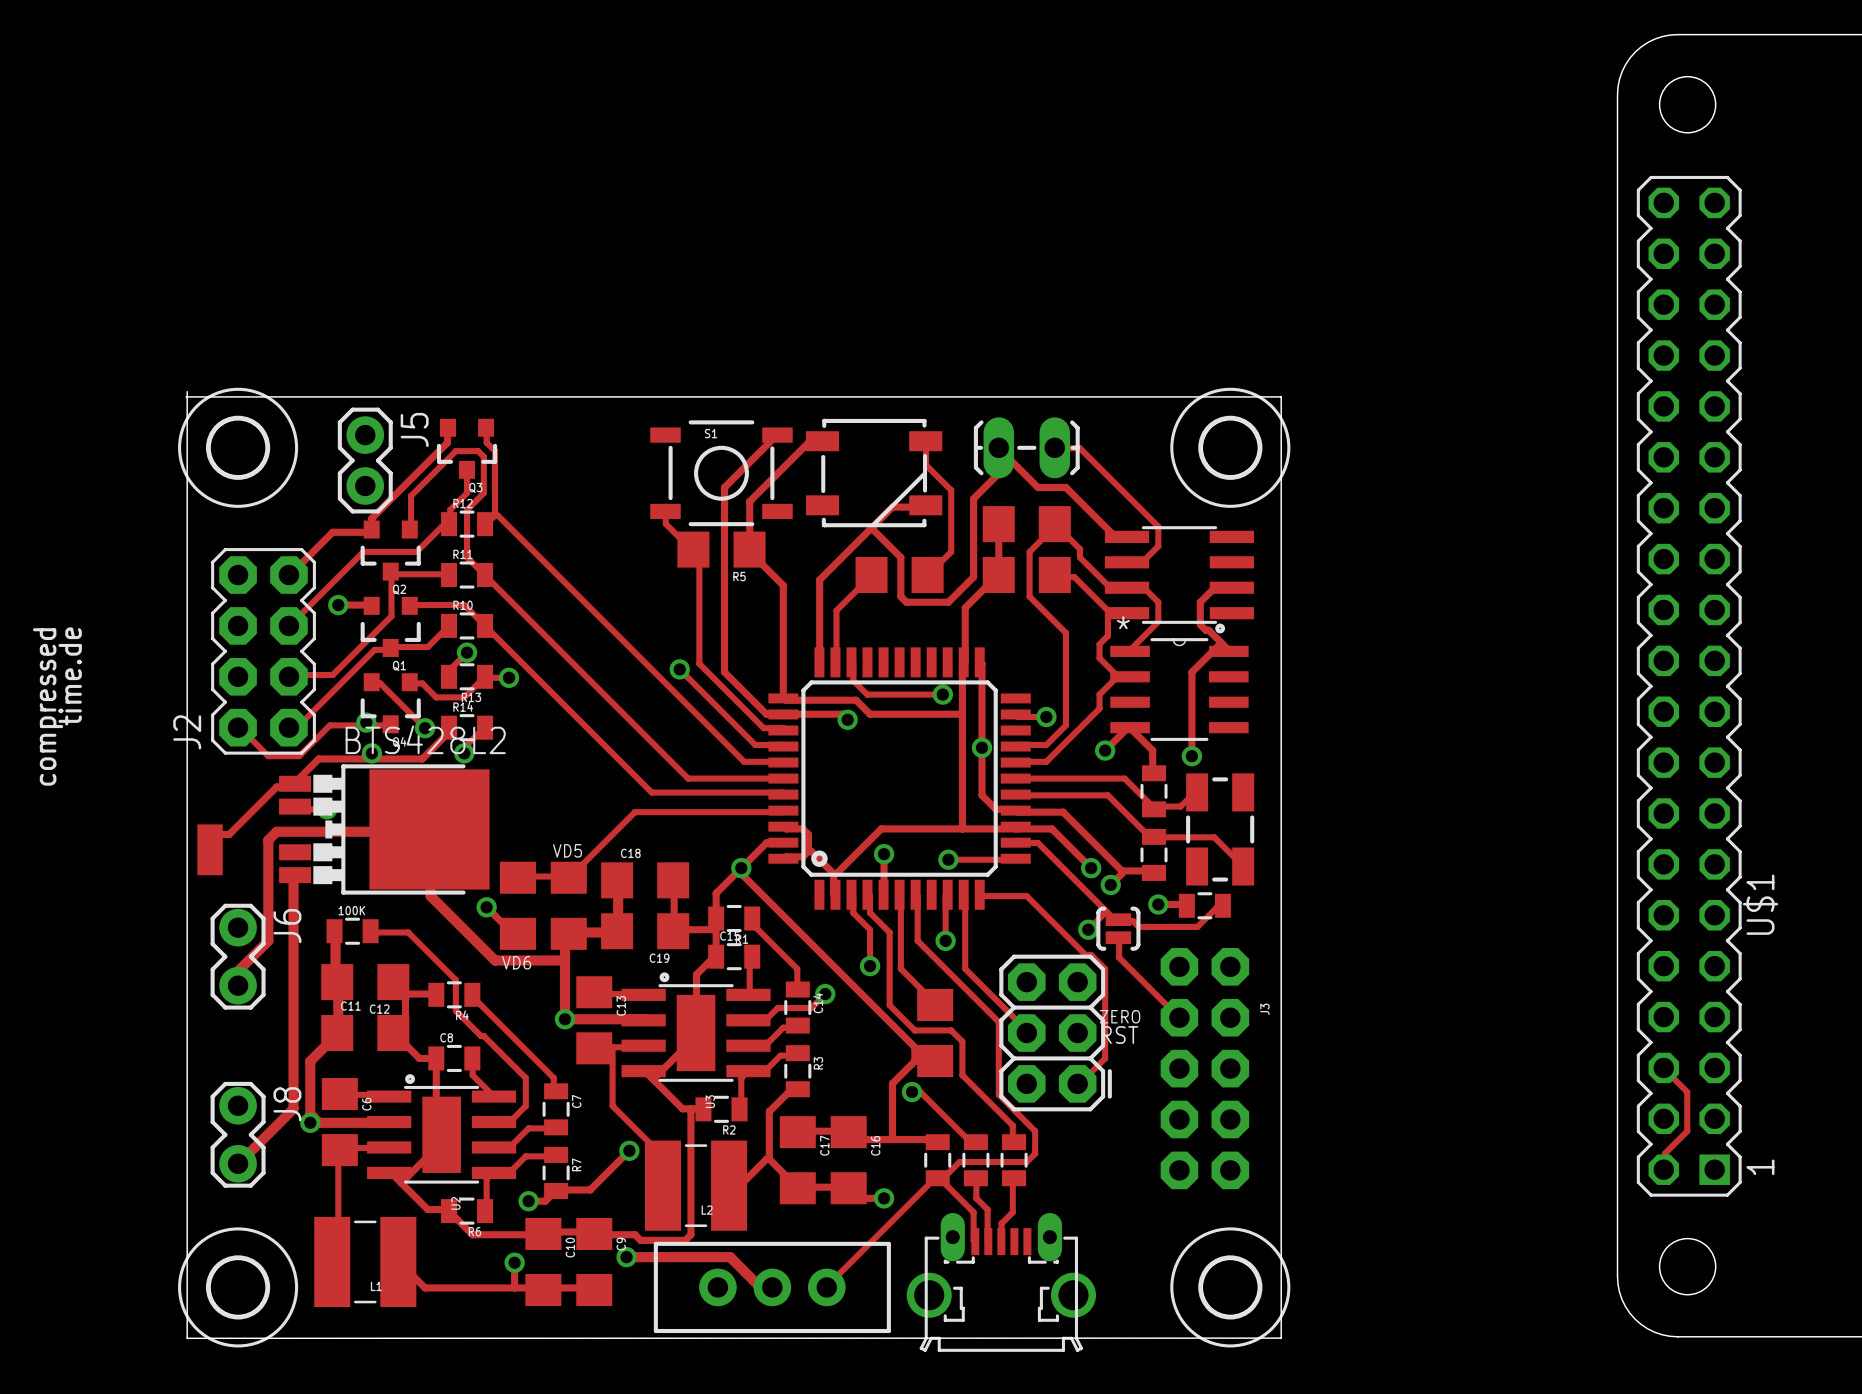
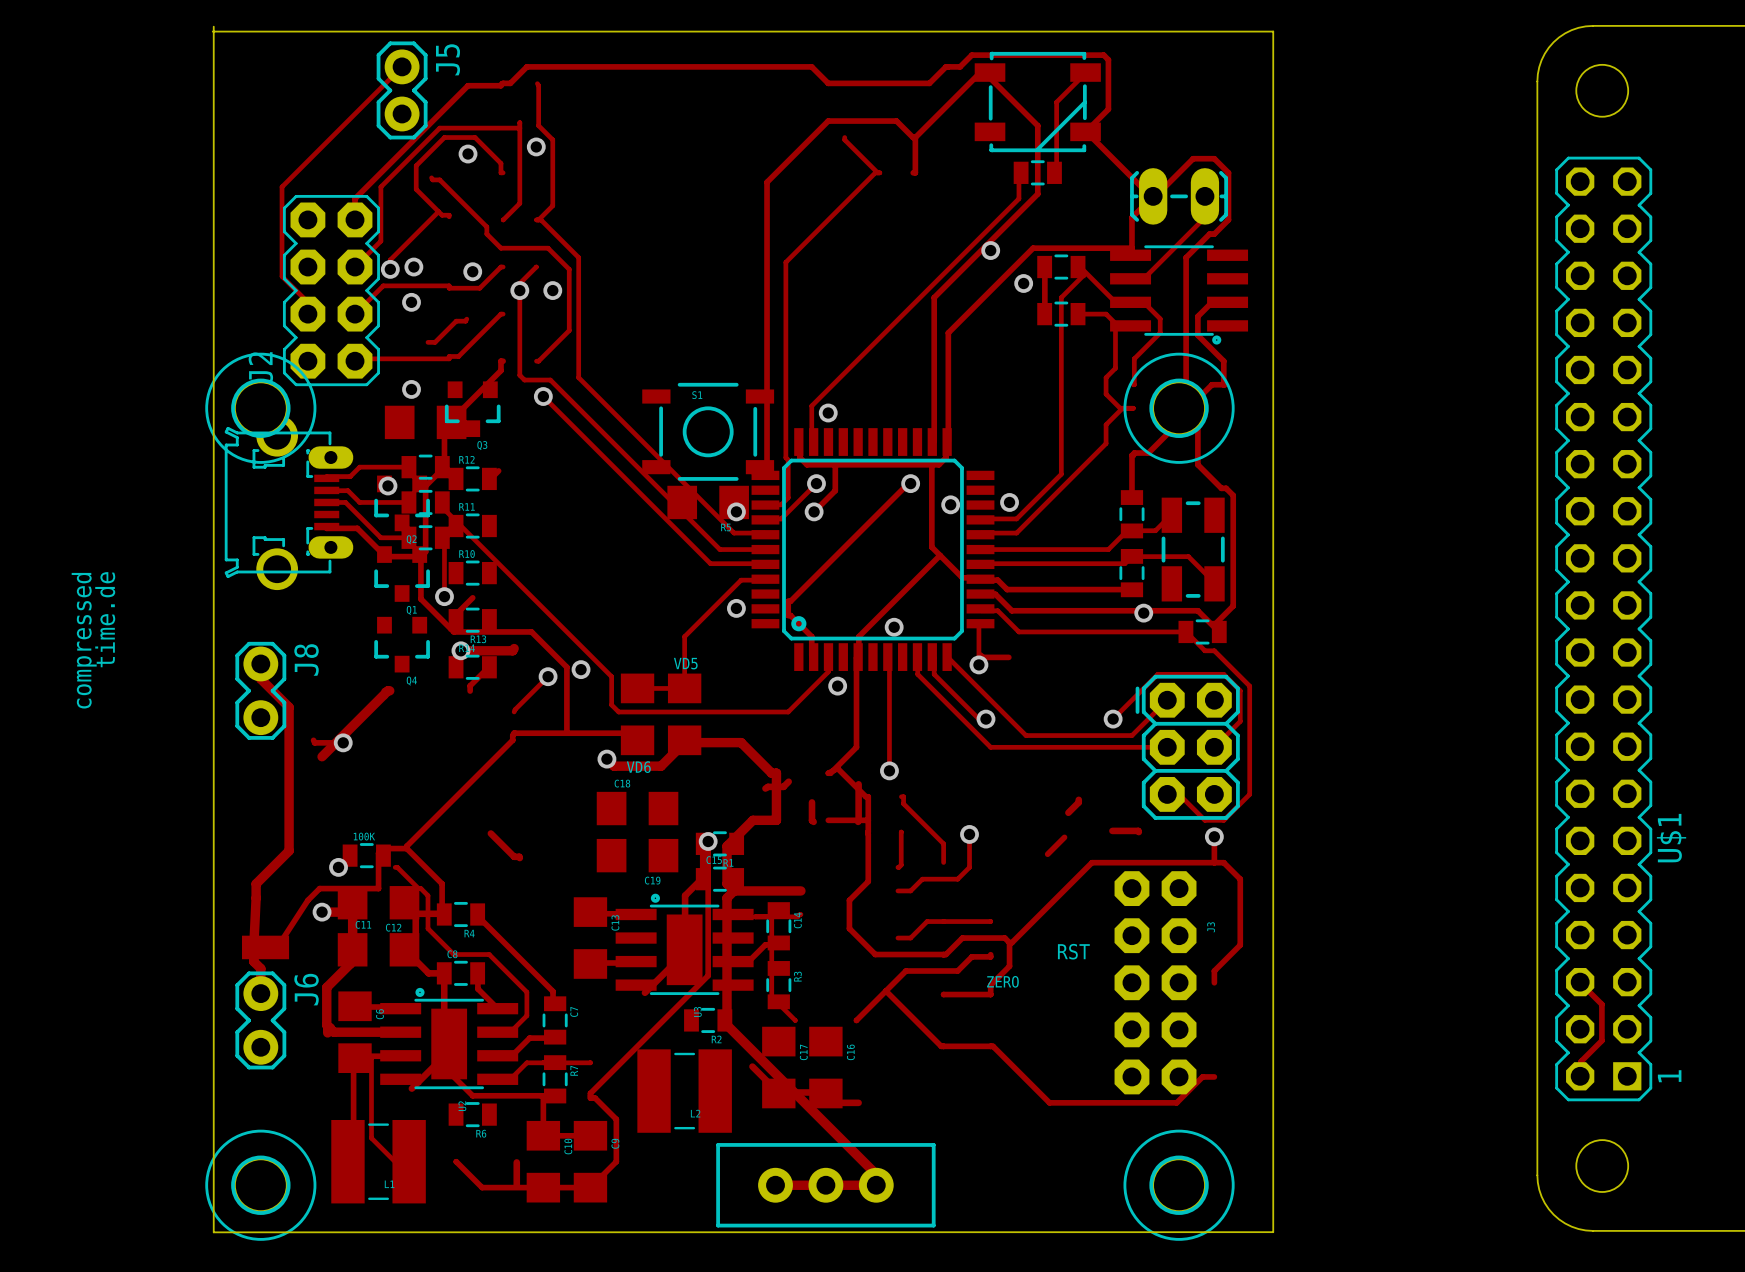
board edge: none -> (213, 26) (213, 356)
track: none -> (402, 66) (282, 186) (282, 276) (307, 302) (307, 314)
track: none -> (1085, 72) (1056, 102) (1056, 172) (1054, 172)
track: none -> (537, 83) (538, 125) (552, 139) (552, 205) (538, 219)
track: none -> (519, 122) (519, 203) (503, 219)
track: none -> (519, 128) (439, 128) (380, 186) (380, 241) (355, 267)
track: none -> (844, 137) (844, 139) (877, 172)
track: none -> (915, 137) (915, 172) (913, 172)
track: none -> (915, 137) (978, 73) (990, 72) (988, 76) (1037, 125) (1037, 194) (934, 297) (934, 441) (932, 442)
track: none -> (915, 137) (913, 137) (896, 121) (828, 121) (767, 182) (767, 474) (765, 475)
via: none -> (536, 146)
via: none -> (468, 154)
track: none -> (503, 172) (500, 172) (500, 163) (475, 137) (444, 137) (416, 165) (416, 189) (442, 215) (449, 215) (449, 216)
track: none -> (879, 172) (875, 172) (785, 262) (785, 457) (788, 460) (788, 497) (781, 504) (765, 505)
track: none -> (1021, 172) (1018, 172) (1018, 198) (811, 405) (811, 441) (813, 442)
part: none -> (1037, 172)
track: none -> (431, 177) (432, 179) (439, 179) (486, 227) (486, 234) (500, 248) (548, 248) (569, 269) (569, 330) (536, 361)
track: none -> (1153, 196) (1131, 217) (1130, 255)
track: none -> (1204, 196) (1204, 217) (1143, 278) (1130, 278)
track: none -> (438, 211) (390, 259) (390, 269)
track: none -> (355, 219) (355, 198) (468, 85) (500, 85) (503, 83) (510, 83) (526, 66) (811, 66) (828, 83) (929, 83) (945, 66) (960, 66) (971, 55) (1103, 55) (1108, 59) (1108, 109) (1085, 131) (1150, 196) (1155, 196) (1193, 158) (1214, 158) (1228, 172) (1228, 219) (1214, 234) (1209, 234) (1186, 257) (1186, 415) (1148, 453) (1134, 453) (1131, 455) (1131, 497)
track: none -> (536, 219) (541, 219) (578, 257) (578, 377) (734, 533) (764, 533) (765, 534)
track: none -> (1131, 248) (1033, 248) (948, 332) (948, 441) (945, 443) (945, 457) (938, 464) (807, 464) (799, 457) (798, 442)
via: none -> (990, 250)
via: none -> (413, 267)
track: none -> (503, 267) (479, 288) (449, 288) (449, 285) (383, 285) (355, 314)
track: none -> (536, 267) (519, 283) (519, 375) (524, 380) (550, 380) (719, 549) (765, 549)
track: none -> (1044, 267) (1044, 314)
part: none -> (1061, 267)
via: none -> (390, 269)
via: none -> (472, 271)
via: none -> (1023, 283)
via: none -> (519, 290)
via: none -> (552, 290)
part: none -> (1179, 294)
via: none -> (411, 302)
track: none -> (1227, 302) (1212, 302) (1197, 316) (1197, 335) (1223, 361) (1223, 384)
track: none -> (503, 314) (458, 356) (449, 356) (449, 358) (357, 358) (355, 361)
part: none -> (1061, 314)
track: none -> (1078, 314) (1106, 314) (1117, 325)
track: none -> (466, 319) (465, 321) (456, 321) (435, 342) (427, 342)
track: none -> (1130, 325) (1115, 325) (1115, 368) (1106, 377) (1106, 394) (1120, 408) (1133, 408)
board edge: (186, 396) (1281, 396) (1281, 1338) -> (212, 31) (1273, 31) (1273, 1232) (1226, 1232)
track: none -> (503, 361) (500, 361) (500, 370) (444, 429) (444, 467) (442, 467) (425, 485) (425, 551) (420, 556)
track: none -> (1133, 384) (1134, 358) (1160, 332) (1160, 318) (1143, 302) (1115, 302) (1078, 267) (1084, 274) (1061, 297) (1061, 474) (1016, 518) (980, 519)
track: none -> (1224, 384) (1212, 384) (1197, 398) (1197, 464) (1221, 488) (1226, 488) (1233, 495) (1233, 606) (1214, 624) (1219, 631)
via: none -> (411, 389)
track: (448, 427) (447, 442) (371, 518) (371, 529) (369, 532) (332, 532) (288, 575) -> none
track: (486, 427) (486, 442) (495, 451) (495, 515) (497, 515) (744, 761) (783, 762) -> none
track: none -> (543, 396) (710, 563) (765, 564)
via: none -> (543, 396)
track: (777, 435) (724, 487) (724, 672) (766, 714) (783, 714) -> none
track: (822, 441) (822, 442) (808, 442) (749, 501) (749, 551) (783, 585) (783, 698) (786, 700) (856, 700) (870, 714) (962, 714) -> none
track: (925, 441) (926, 465) (951, 490) (951, 551) (927, 575) -> none
part position: (1026, 447) -> (1179, 196)
track: (1054, 447) (1079, 448) (1158, 526) (1158, 546) (1144, 560) (1127, 560) (1127, 562) -> none
track: none -> (1122, 408) (1106, 424) (1106, 443) (1016, 533) (981, 533) (980, 534)
via: none -> (828, 413)
J5 position: (365, 460) -> (402, 90)
part: none -> (425, 422)
track: (467, 469) (467, 493) (450, 509) (450, 523) (447, 526) (441, 526) (416, 551) (363, 551) (288, 625) -> none
part position: (874, 473) -> (1037, 102)
track: (925, 505) (923, 507) (892, 507) (819, 579) (819, 662) -> none
track: none -> (835, 464) (835, 490) (814, 511)
track: none -> (931, 464) (931, 547) (962, 577) (997, 580) (1007, 589) (1131, 589)
track: none -> (408, 467) (359, 467) (350, 476) (326, 476) (326, 478)
part: none -> (425, 467)
track: (665, 511) (665, 523) (699, 557) (699, 663) (763, 728) (783, 728) (783, 730) -> none
track: (998, 524) (998, 575) (965, 607) (965, 661) (962, 663) (962, 828) -> none
part: (1026, 524) -> none
part footprint: [1104, 526, 1254, 634] -> [1119, 490, 1145, 539]
track: (871, 528) (900, 557) (900, 596) (906, 602) (948, 602) (973, 577) (973, 498) (1010, 462) (998, 447) (1037, 487) (1065, 487) (1113, 535) (1127, 536) -> none
track: (409, 529) (411, 495) (455, 451) (478, 451) (483, 456) (483, 493) (467, 509) (467, 557) (688, 778) (783, 778) -> none
track: none -> (816, 483) (781, 518) (765, 519)
via: none -> (816, 483)
track: none -> (910, 483) (908, 483) (790, 601) (788, 601) (788, 615) (790, 615) (811, 636) (811, 655) (813, 657)
via: none -> (910, 483)
via: none -> (387, 485)
track: none -> (326, 490) (347, 490) (359, 502) (408, 502)
part: none -> (289, 502)
track: none -> (326, 502) (345, 502) (380, 537) (408, 537)
part: none -> (425, 502)
track: none -> (442, 502) (444, 502) (444, 509) (611, 676) (611, 704) (618, 712) (788, 712) (828, 671) (828, 657)
via: none -> (1009, 502)
via: none -> (950, 504)
via: none -> (736, 511)
via: none -> (814, 511)
track: none -> (1171, 515) (1155, 530) (1131, 530) (1131, 533) (1124, 533) (1108, 549) (980, 549)
track: none -> (326, 526) (326, 528) (357, 528) (385, 556) (420, 556)
track: (449, 575) (391, 574) (390, 571) (391, 616) (332, 675) (290, 675) (288, 676) -> none
track: (871, 575) (836, 610) (835, 662) -> none
part: (899, 575) -> none
part: (1026, 575) -> none
track: (1054, 575) (1057, 577) (1074, 577) (1107, 610) (1124, 610) (1127, 613) (1107, 613) (1107, 635) (1099, 644) (1099, 658) (1116, 675) (1130, 676) (1116, 677) (1099, 694) (1099, 708) (1046, 761) (1015, 762) -> none
part: none -> (425, 537)
track: none -> (442, 537) (444, 537) (444, 596)
track: (1231, 587) (1214, 588) (1200, 602) (1200, 624) (1205, 630) (1208, 630) (1228, 651) -> none
track: (338, 605) (371, 605) -> none
via: (338, 605) -> none
track: (409, 605) (464, 605) (651, 792) (783, 792) (783, 794) -> none
track: none -> (940, 555) (858, 636) (858, 655) (856, 657) (856, 747) (830, 773) (828, 773) (837, 768) (865, 796) (868, 796) (868, 832)
track: none -> (420, 556) (420, 599) (453, 631) (531, 631) (566, 667) (566, 733)
track: none -> (980, 564) (1124, 563) (1131, 556) (1188, 556) (1214, 583)
track: (449, 625) (427, 647) (391, 647) (388, 649) (374, 649) (299, 725) (290, 725) (288, 727) -> none
part: none -> (1131, 573)
track: none -> (765, 579) (741, 580) (684, 636) (684, 688) (637, 688)
track: (1221, 642) (1191, 672) (1191, 756) -> none
track: none -> (980, 594) (995, 594) (1011, 610) (1197, 610) (1219, 631)
J2 position: (263, 651) -> (331, 290)
via: none -> (444, 596)
track: (1130, 651) (1158, 621) (1158, 602) (1144, 588) (1107, 585) (1079, 557) (1079, 549) (1054, 524) (1054, 526) (1029, 551) (1029, 596) (1065, 633) (1065, 725) (1046, 744) (1015, 746) -> none
via: (467, 652) -> none
track: (851, 662) (853, 663) (853, 680) (867, 694) (942, 694) -> none
track: (979, 662) (982, 663) (982, 795) (996, 809) (1012, 809) (1018, 812) (1063, 812) (1121, 870) (1152, 870) (1154, 872) -> none
via: none -> (736, 608)
track: none -> (980, 608) (981, 610) (997, 610) (1018, 631) (1186, 631) (1204, 650) (1214, 650) (1249, 686) (1249, 794) (1223, 820) (1204, 820) (1179, 794) (1167, 794)
track: (679, 669) (755, 744) (783, 744) (783, 746) -> none
via: (679, 669) -> none
via: none -> (1143, 613)
track: (509, 677) (485, 676) (464, 697) (436, 697) (422, 683) (409, 682) -> none
via: (509, 677) -> none
track: none -> (980, 623) (978, 624) (978, 664)
track: (371, 682) (380, 683) (425, 728) -> none
part: (1179, 689) -> none
part: none -> (1202, 631)
via position: (942, 694) -> (894, 627)
track: none -> (514, 648) (512, 650) (460, 650)
via: none -> (460, 650)
track: (783, 714) (842, 714) (847, 719) -> none
track: none -> (887, 657) (889, 657) (889, 770)
track: none -> (917, 657) (917, 674) (990, 747) (1167, 747)
track: none -> (932, 657) (934, 657) (934, 674) (978, 719) (985, 719)
track: none -> (947, 657) (1026, 735) (1131, 735) (1167, 700)
via: (1046, 717) -> none
via position: (847, 719) -> (837, 686)
via: (366, 722) -> none
track: none -> (260, 663) (260, 679) (289, 707) (289, 850) (256, 883) (253, 961) (260, 968) (260, 993)
track: (390, 724) (329, 725) (299, 756) (268, 756) (238, 727) -> none
via: none -> (978, 664)
track: (449, 727) (447, 733) (422, 758) (318, 758) (296, 781) (293, 786) (276, 786) (229, 834) (212, 834) (210, 837) -> none
via: (425, 728) -> none
via: none -> (581, 669)
track: none -> (548, 676) (514, 711)
via: none -> (548, 676)
via: (982, 747) -> none
track: (1105, 750) (1130, 727) (1152, 750) (1154, 773) -> none
via: (1105, 750) -> none
via: (371, 753) -> none
track: none -> (389, 690) (322, 756)
via: (464, 753) -> none
via: (1191, 756) -> none
part position: (899, 778) -> (872, 549)
track: (1015, 778) (1124, 778) (1154, 809) (1155, 806) (1180, 806) (1197, 792) -> none
via: none -> (985, 719)
track: none -> (1113, 719) (1157, 674) (1223, 674) (1240, 690) (1240, 721) (1214, 747)
via: none -> (1113, 719)
part: (1154, 791) -> none
track: (1015, 794) (1107, 795) (1147, 834) (1152, 834) (1155, 837) (1214, 837) (1243, 866) -> none
track: none -> (637, 740) (630, 733) (514, 733) (512, 740) (406, 846) (406, 848)
track: (783, 810) (783, 812) (634, 812) (568, 877) (517, 877) -> none
track: none -> (606, 759) (613, 766) (661, 766) (684, 740) (684, 742) (741, 742) (771, 773) (776, 773) (776, 820) (752, 820) (727, 846) (727, 883) (734, 890)
via: none -> (606, 759)
track: (783, 826) (786, 828) (802, 828) (808, 834) (808, 851) (811, 851) (833, 873) (836, 873) (881, 828) (1015, 828) (1015, 826) (1018, 828) (1051, 828) (1091, 868) -> none
BTS428L2: (384, 829) -> none
part position: (1220, 829) -> (1193, 549)
via: none -> (889, 770)
track: (783, 842) (766, 842) (716, 893) (716, 918) (713, 929) (673, 931) (673, 880) -> none
track: (1015, 842) (1037, 842) (1116, 921) (1118, 919) (1119, 921) (1133, 921) (1138, 926) (1197, 926) (1217, 907) (1222, 905) -> none
part rotation: 0° (210, 849) -> 90° clockwise (265, 947)
part position: (210, 849) -> (265, 947)
via: (884, 854) -> none
part: (1154, 854) -> none
track: (1015, 858) (948, 859) -> none
via: (948, 859) -> none
track: none -> (901, 796) (903, 796) (903, 803) (943, 843) (943, 862)
via position: (741, 868) -> (708, 841)
via: (1091, 868) -> none
track: (738, 870) (914, 1047) (914, 1061) -> none
track: (295, 875) (293, 876) (293, 1108) (238, 1163) -> none
track: (617, 880) (617, 931) (570, 932) (565, 935) (565, 1013) (570, 1019) (643, 1020) -> none
via: (1110, 884) -> none
track: none -> (828, 820) (868, 820)
track: (851, 894) (853, 896) (853, 912) (870, 929) (870, 966) -> none
track: (867, 894) (870, 896) (870, 912) (889, 932) (889, 1005) (914, 1030) (951, 1030) (962, 1041) (962, 1075) (1012, 1125) (1014, 1142) -> none
track: (899, 894) (900, 968) (935, 1004) -> none
track: (915, 894) (917, 896) (917, 940) (998, 1022) (998, 1094) (1035, 1131) (1035, 1153) (1026, 1161) (959, 1161) (942, 1178) (937, 1178) -> none
track: (947, 894) (945, 896) (945, 940) -> none
track: (963, 894) (965, 896) (965, 968) (1026, 1030) (1026, 1033) -> none
track: (979, 894) (1026, 896) (1085, 954) (1091, 954) (1105, 968) (1105, 1058) (1077, 1083) -> none
via: (1158, 904) -> none
VD6 position: (517, 905) -> (637, 714)
VD5 position: (568, 905) -> (684, 714)
track: none -> (868, 832) (868, 881) (849, 900) (849, 928) (875, 954) (943, 954)
track: none -> (901, 832) (901, 865) (897, 867)
part: (1204, 905) -> none
via: (486, 907) -> none
track: none -> (969, 834) (969, 867) (957, 879) (922, 879) (910, 890) (897, 890)
via: none -> (969, 834)
track: none -> (1214, 836) (1214, 862)
via: none -> (1214, 836)
track: none -> (708, 841) (708, 975) (590, 1093) (590, 1098) (595, 1098) (616, 1119) (616, 1161) (590, 1187) (482, 1187) (456, 1161)
track: (752, 918) (752, 924) (797, 968) (797, 989) -> none
track: none -> (406, 848) (383, 848) (378, 853) (378, 888) (319, 888) (307, 900) (277, 947)
track: none -> (406, 848) (442, 883) (442, 914) (444, 914)
part: (1118, 928) -> none
via: (1088, 929) -> none
track: (334, 931) (335, 980) (338, 985) (338, 1030) (335, 1036) (310, 1061) (310, 1114) (318, 1122) (389, 1122) -> (322, 912) (347, 912) (352, 914) (352, 961) (326, 987) (326, 1025) (333, 1032) (400, 1032)
track: (370, 931) (408, 932) (455, 980) (455, 1010) (525, 1078) (525, 1106) (511, 1120) (495, 1120) (494, 1122) -> (395, 867) (427, 895) (427, 928) (453, 954) (489, 954) (526, 992) (526, 1015) (510, 1032) (497, 1032)
track: (1118, 937) (1119, 957) (1179, 1017) -> none
via: (945, 940) -> none
via: none -> (338, 867)
J6 position: (238, 956) -> (260, 1020)
track: (752, 956) (749, 957) (748, 994) -> none
track: (565, 960) (495, 960) (430, 896) (429, 829) (427, 831) (276, 831) (268, 840) (268, 940) (240, 968) (240, 985) (238, 985) -> none
via: (870, 966) -> none
track: none -> (734, 890) (800, 890)
track: none -> (734, 890) (727, 898) (727, 1025) (887, 1185) (775, 1185)
via: none -> (322, 912)
track: none -> (800, 914) (797, 916) (755, 916) (771, 916) (771, 996) (795, 1020)
track: (825, 994) (811, 1008) (777, 1008) (766, 1019) (748, 1020) -> none
via: (825, 994) -> none
track: none -> (990, 921) (927, 921) (910, 938) (897, 938)
text position: ZERO (1120, 1016) -> ZERO (1002, 981)
via: (565, 1019) -> none
track: none -> (1009, 942) (1009, 966) (990, 985) (990, 994) (943, 994)
track: none -> (1009, 942) (1004, 938) (962, 938) (943, 954)
track: none -> (1009, 942) (1011, 942) (1091, 862) (1223, 862) (1240, 879) (1240, 945) (1214, 971) (1214, 982)
part: (935, 1033) -> none
part rotation: 0° (1055, 1033) -> 180° (1187, 747)
part position: (1055, 1033) -> (1187, 747)
track: none -> (990, 954) (990, 956) (971, 956) (957, 971) (905, 971) (856, 1020)
track: (612, 1047) (612, 1106) (662, 1156) (662, 1185) -> none
track: (797, 1053) (797, 1055) (780, 1055) (766, 1069) (749, 1069) (741, 1078) (741, 1108) (739, 1109) -> none
track: (914, 1061) (892, 1083) (892, 1139) -> none
track: (643, 1071) (682, 1108) (703, 1109) -> none
track: none -> (885, 991) (941, 1046) (993, 1046) (1049, 1102) (1176, 1102) (1202, 1076) (1214, 1076)
track: (797, 1089) (791, 1089) (769, 1111) (769, 1159) (766, 1159) (741, 1184) (729, 1185) -> none
track: (912, 1092) (920, 1092) (968, 1139) (973, 1139) (975, 1142) -> none
via: (912, 1092) -> none
track: (690, 1108) (690, 1234) (685, 1240) (640, 1240) (634, 1234) (595, 1234) (592, 1231) (545, 1231) (539, 1234) (472, 1234) (447, 1209) (427, 1209) (389, 1172) -> none
via: (310, 1122) -> none
track: (797, 1132) (847, 1131) (856, 1139) (937, 1139) (937, 1142) -> none
J8 position: (238, 1134) -> (260, 690)
track: none -> (449, 1043) (437, 1060) (472, 1095) (543, 1095) (543, 1135) (590, 1135)
track: none -> (355, 1058) (371, 1058) (371, 1138) (395, 1161)
track: (629, 1150) (590, 1189) (556, 1189) (545, 1201) (528, 1201) -> none
via: (629, 1150) -> none
track: (556, 1154) (525, 1156) (511, 1170) (495, 1170) (486, 1178) (485, 1211) -> none
track: none -> (590, 1062) (526, 1062) (510, 1079) (497, 1079)
part: (937, 1160) -> none
part: (975, 1160) -> none
part: (1014, 1160) -> none
track: (937, 1178) (973, 1212) (973, 1240) (975, 1241) -> none
track: (937, 1178) (937, 1175) (826, 1287) -> none
track: (975, 1178) (976, 1198) (987, 1209) (988, 1241) -> none
track: (1014, 1178) (1012, 1212) (1001, 1223) (1001, 1241) -> none
via: (884, 1198) -> none
via: (528, 1201) -> none
track: (626, 1257) (730, 1257) (758, 1285) (772, 1285) (772, 1287) -> none
via: (626, 1257) -> none
track: (398, 1261) (425, 1287) (542, 1287) (543, 1290) (545, 1287) (592, 1287) (594, 1290) -> none
via: (514, 1262) -> none
part: (1001, 1282) -> none
part position: (772, 1287) -> (825, 1185)

